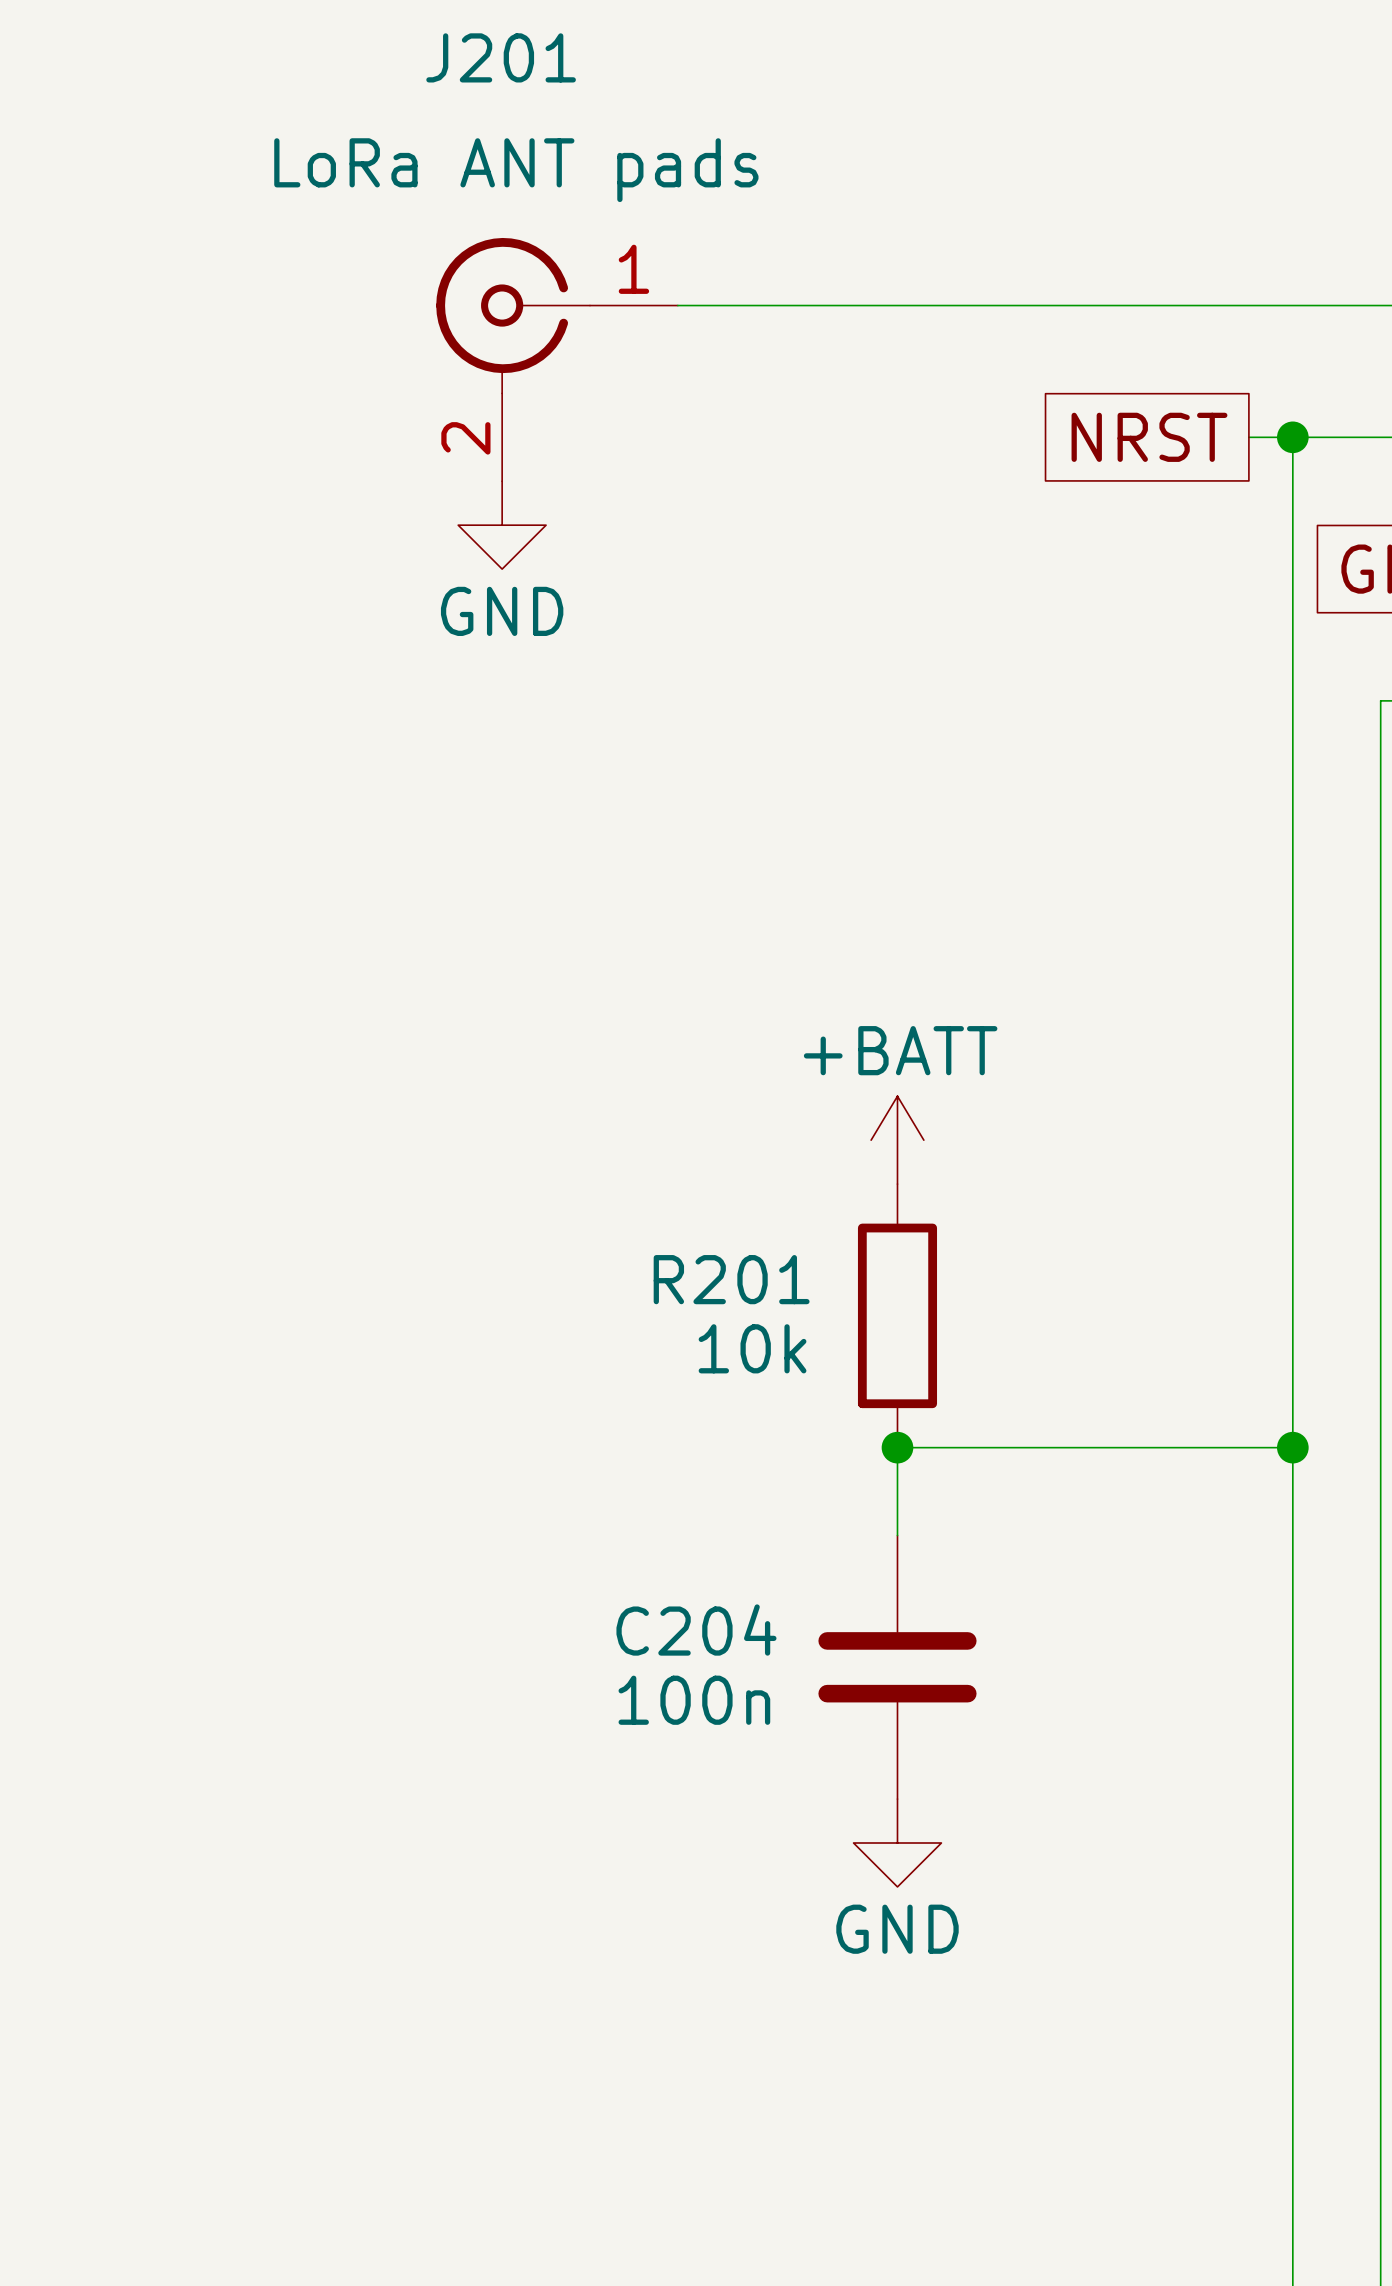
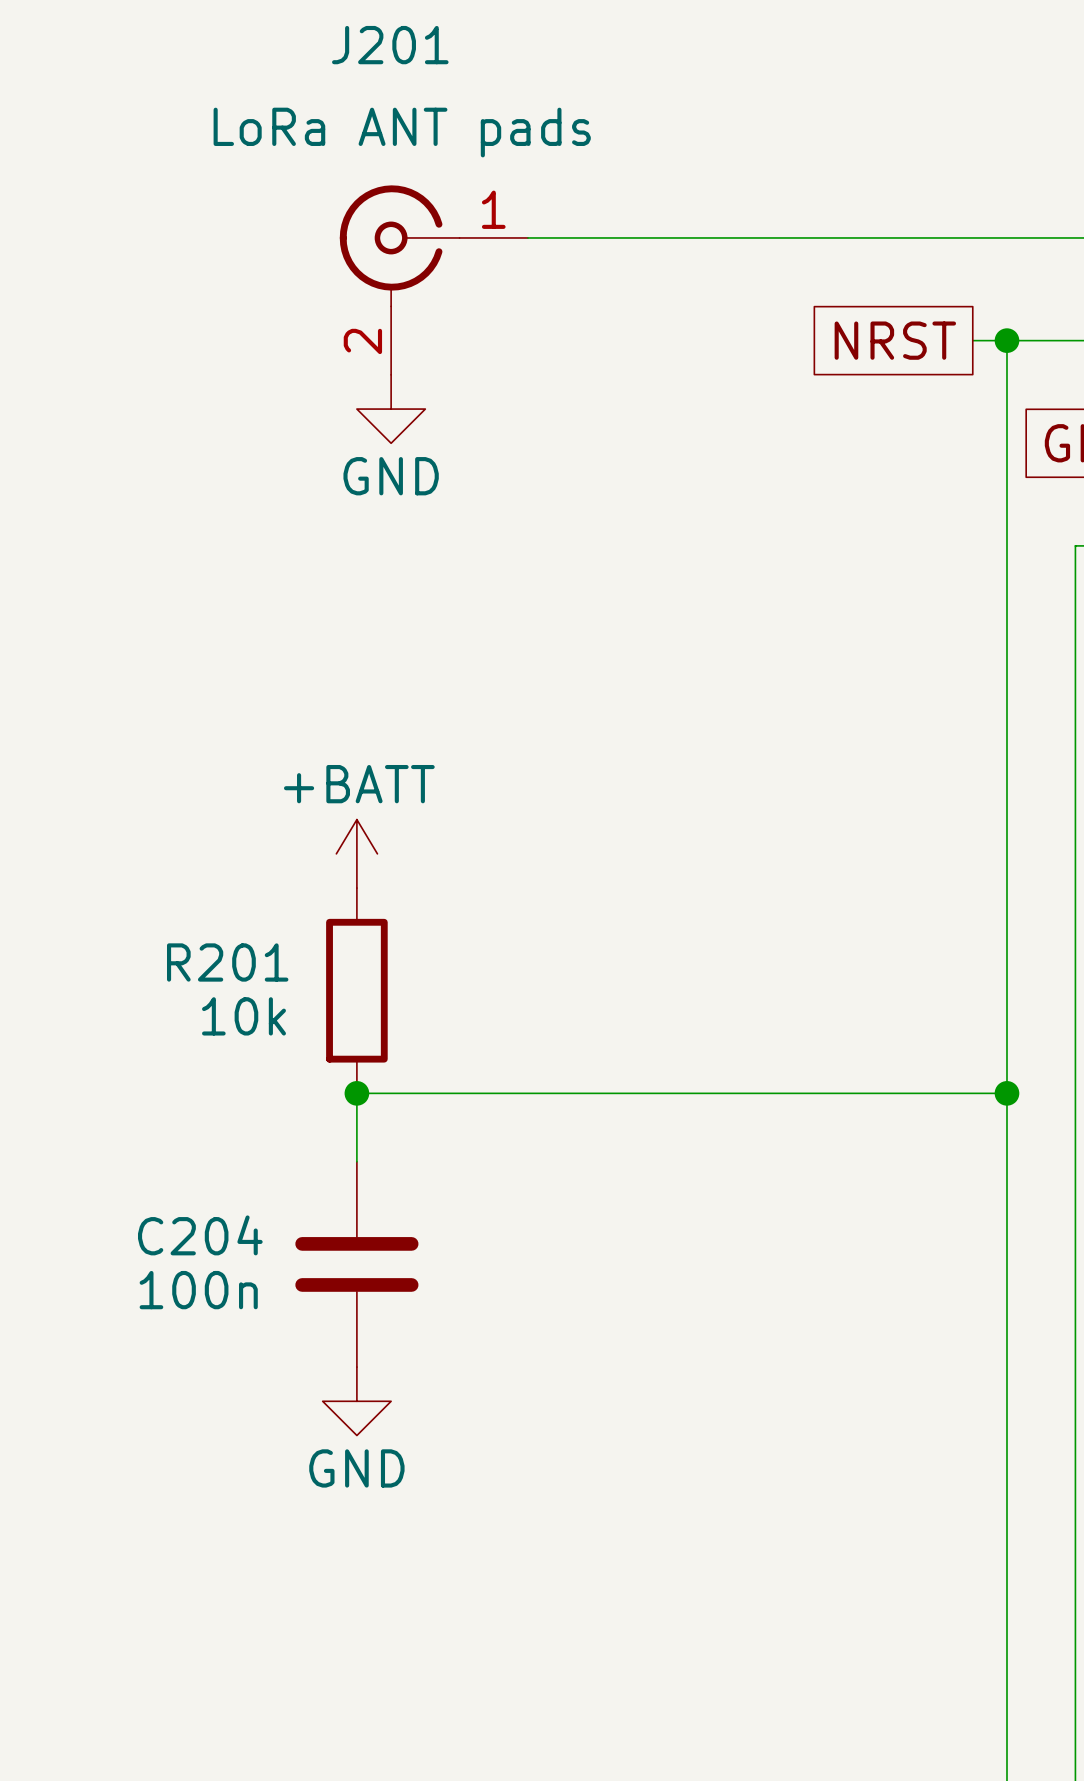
power symbol position: +BATT (897, 1140) -> +BATT (356, 853)
R201 position: (897, 1315) -> (356, 990)
junction: none -> (356, 1093)
wire: none -> (1006, 1093) (356, 1093) (356, 1161)
junction: (897, 1447) -> none
wire: (1292, 1447) (897, 1447) (897, 1535) -> none
junction position: (1292, 1447) -> (1006, 1093)
C204 position: (897, 1667) -> (356, 1264)
power symbol position: GND (897, 1843) -> GND (356, 1401)

